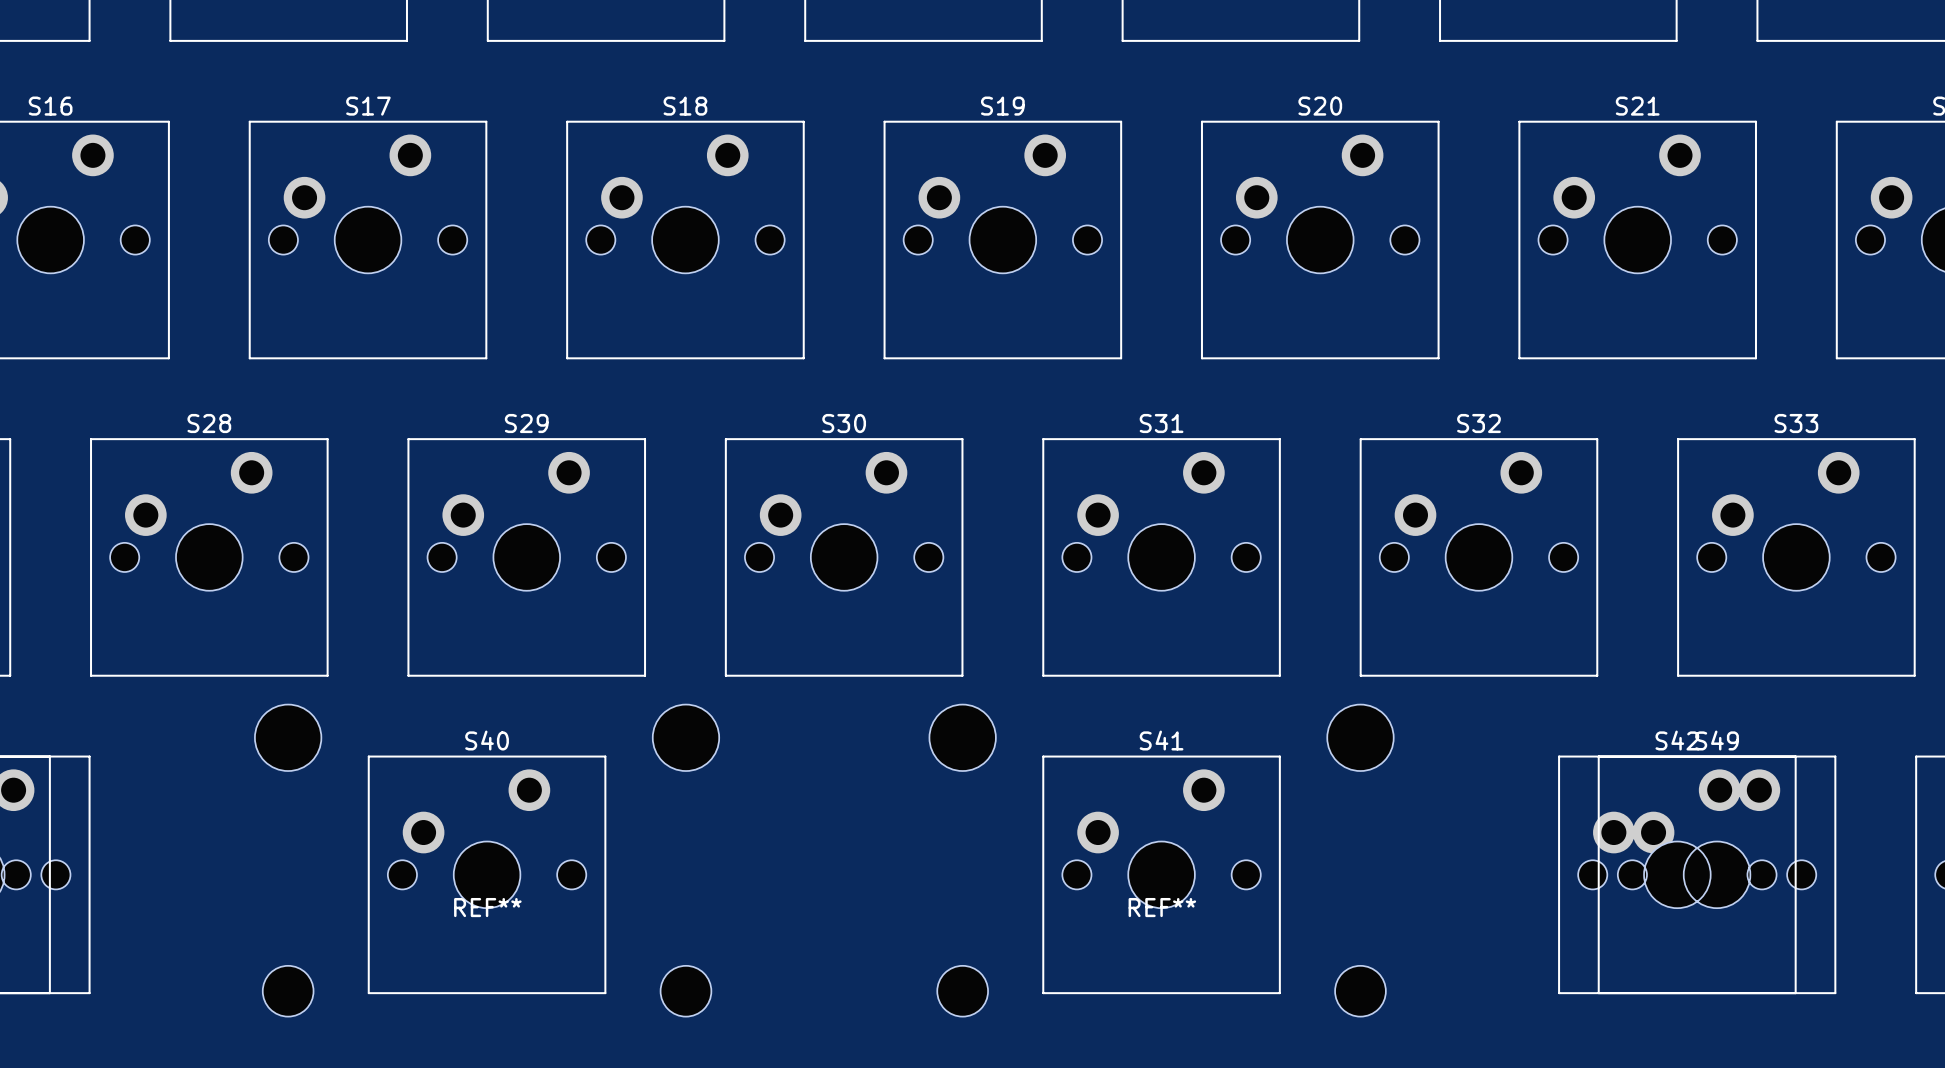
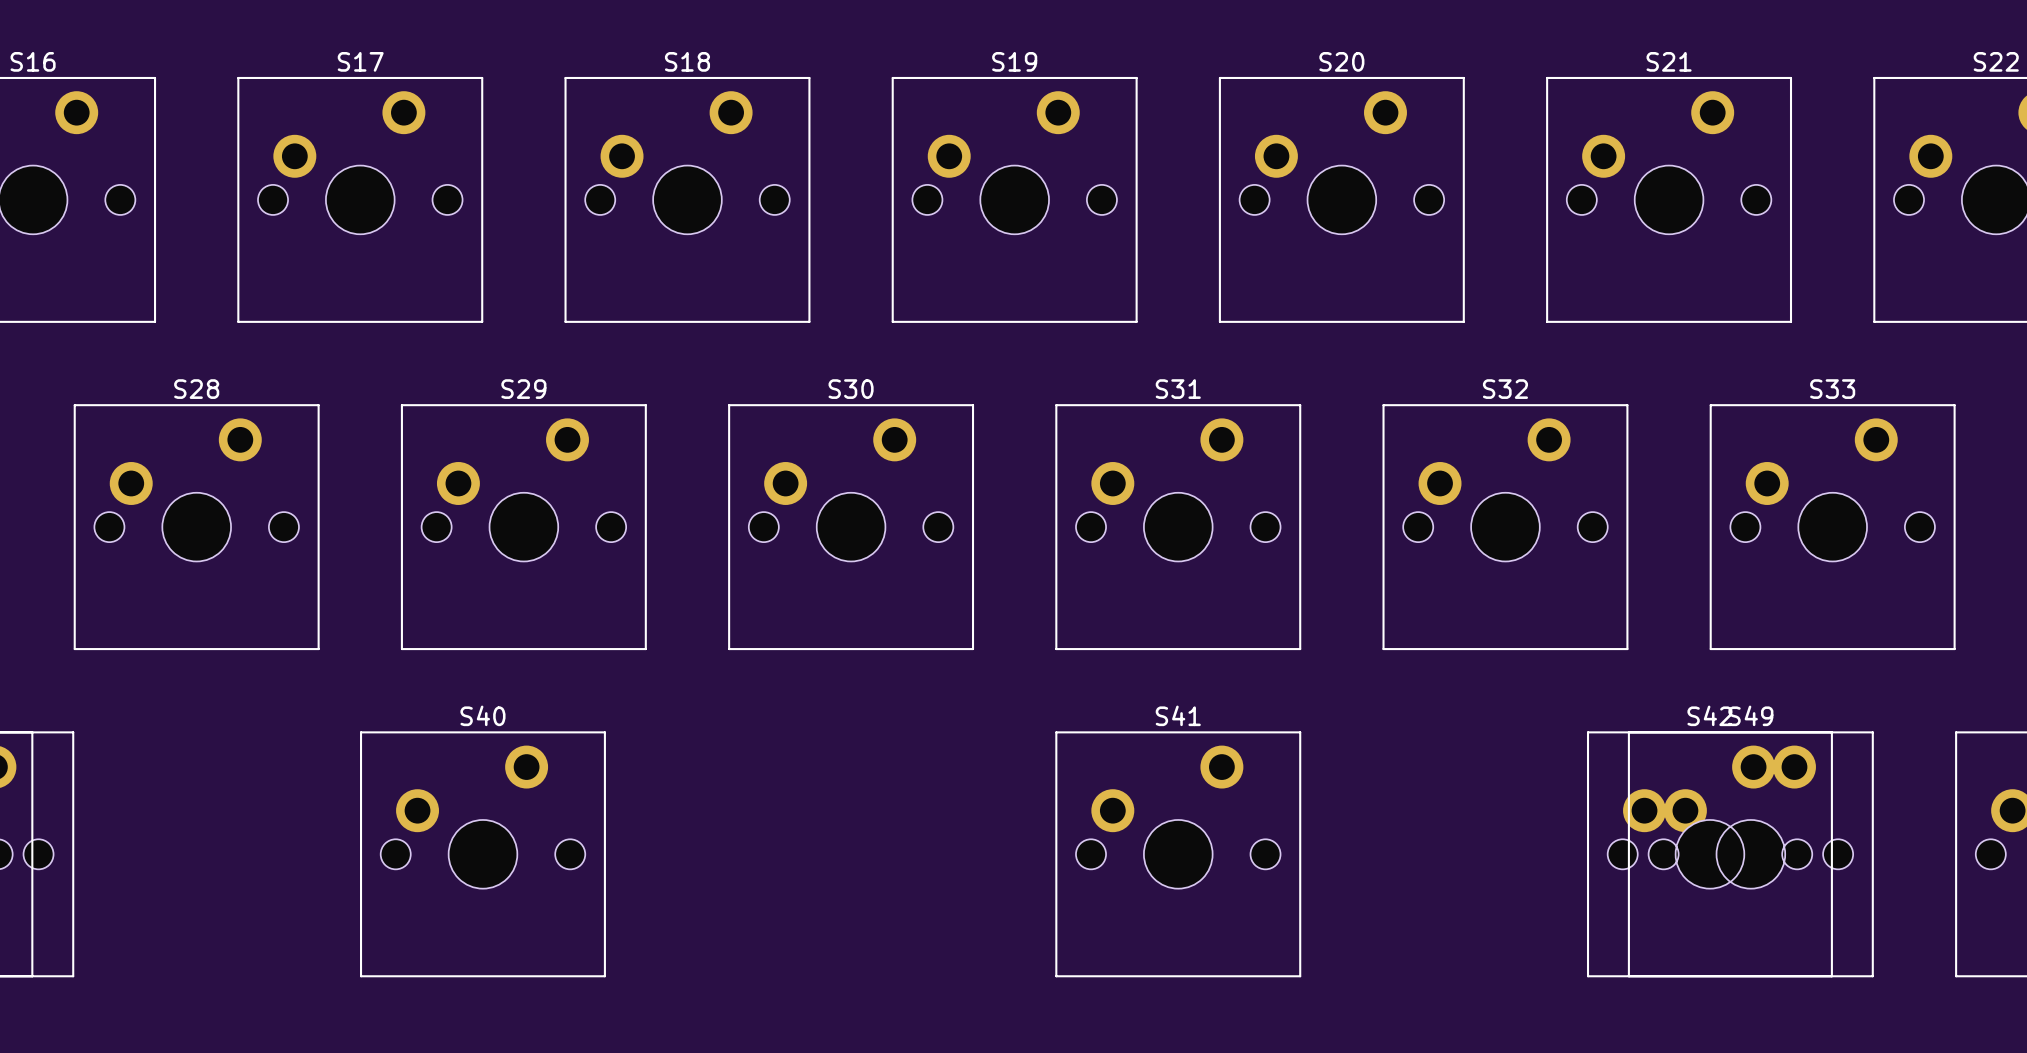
REF**: (487, 860) -> none
REF**: (1161, 860) -> none

